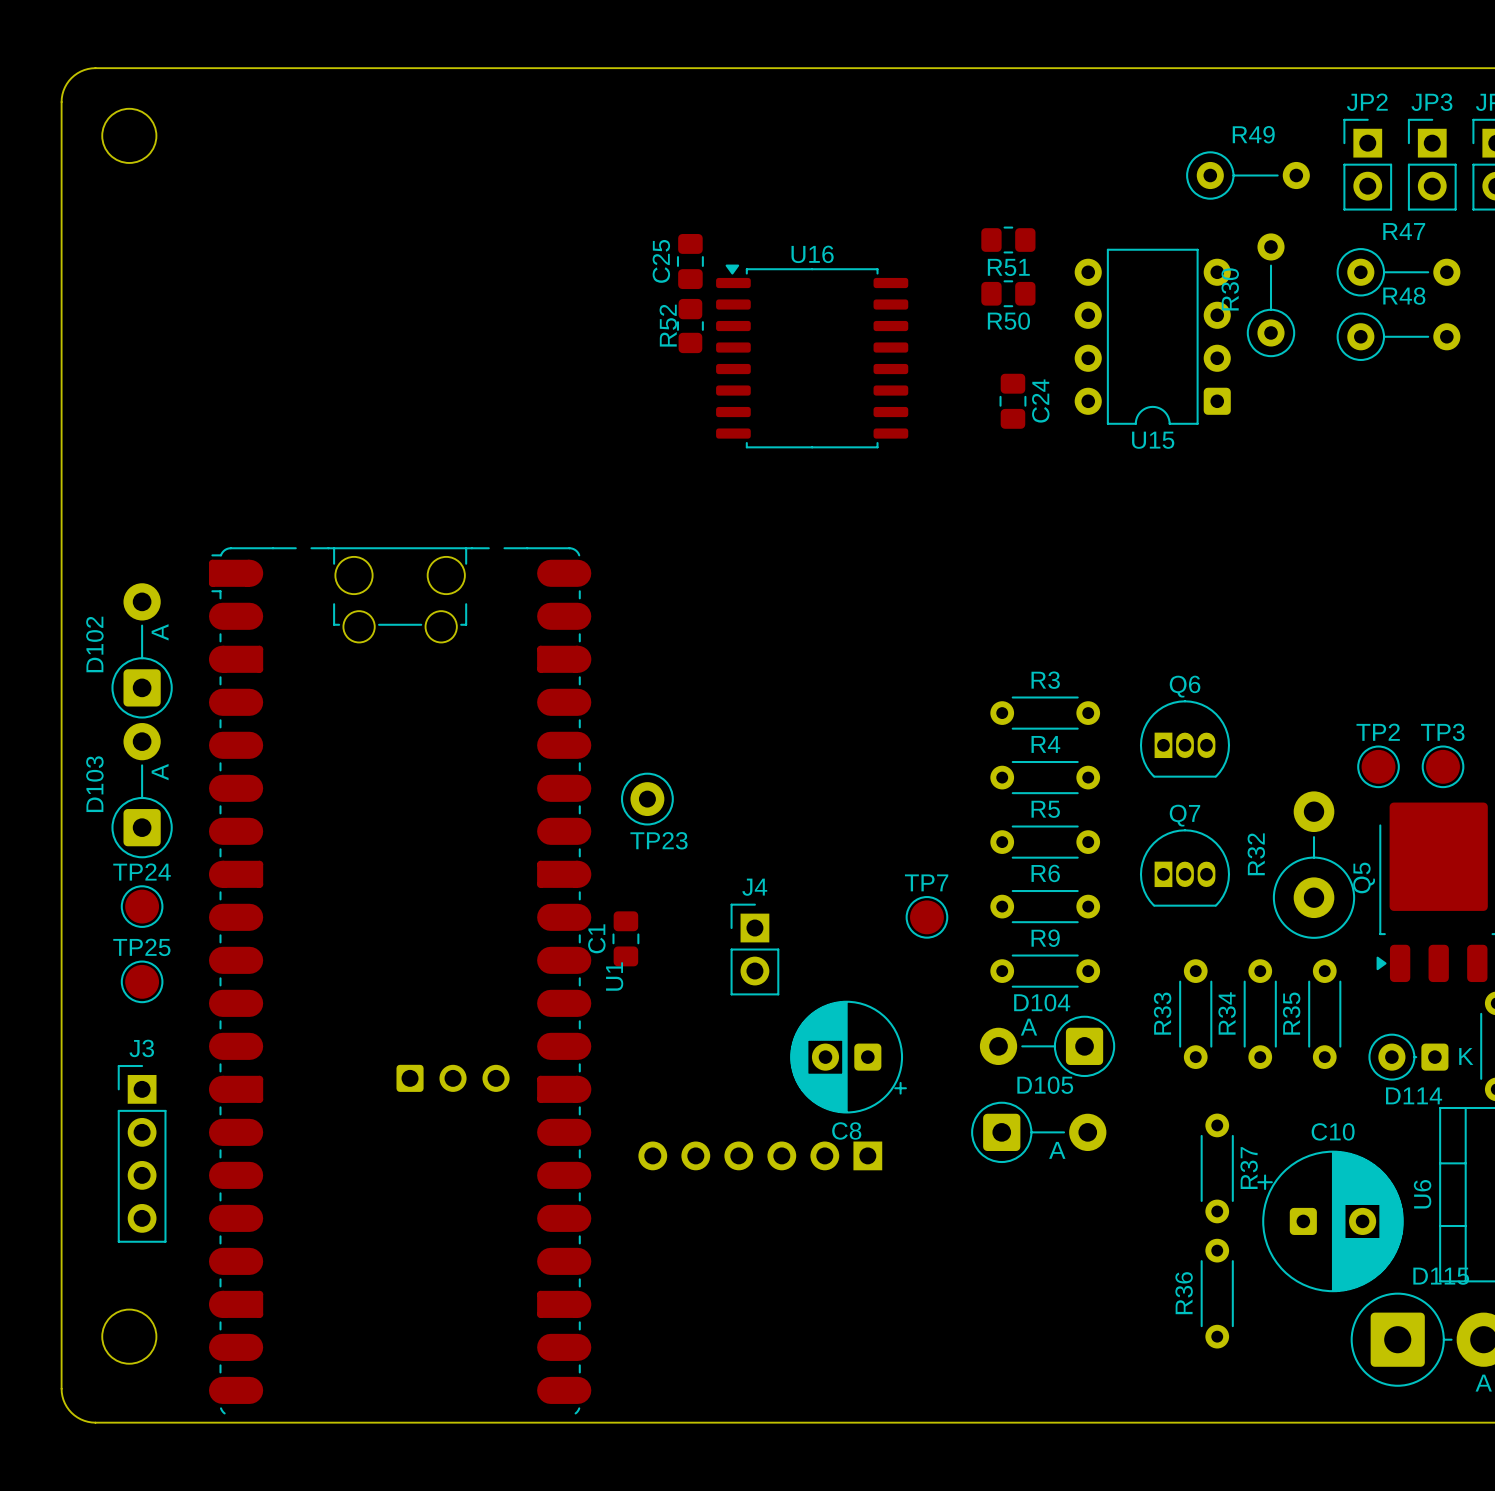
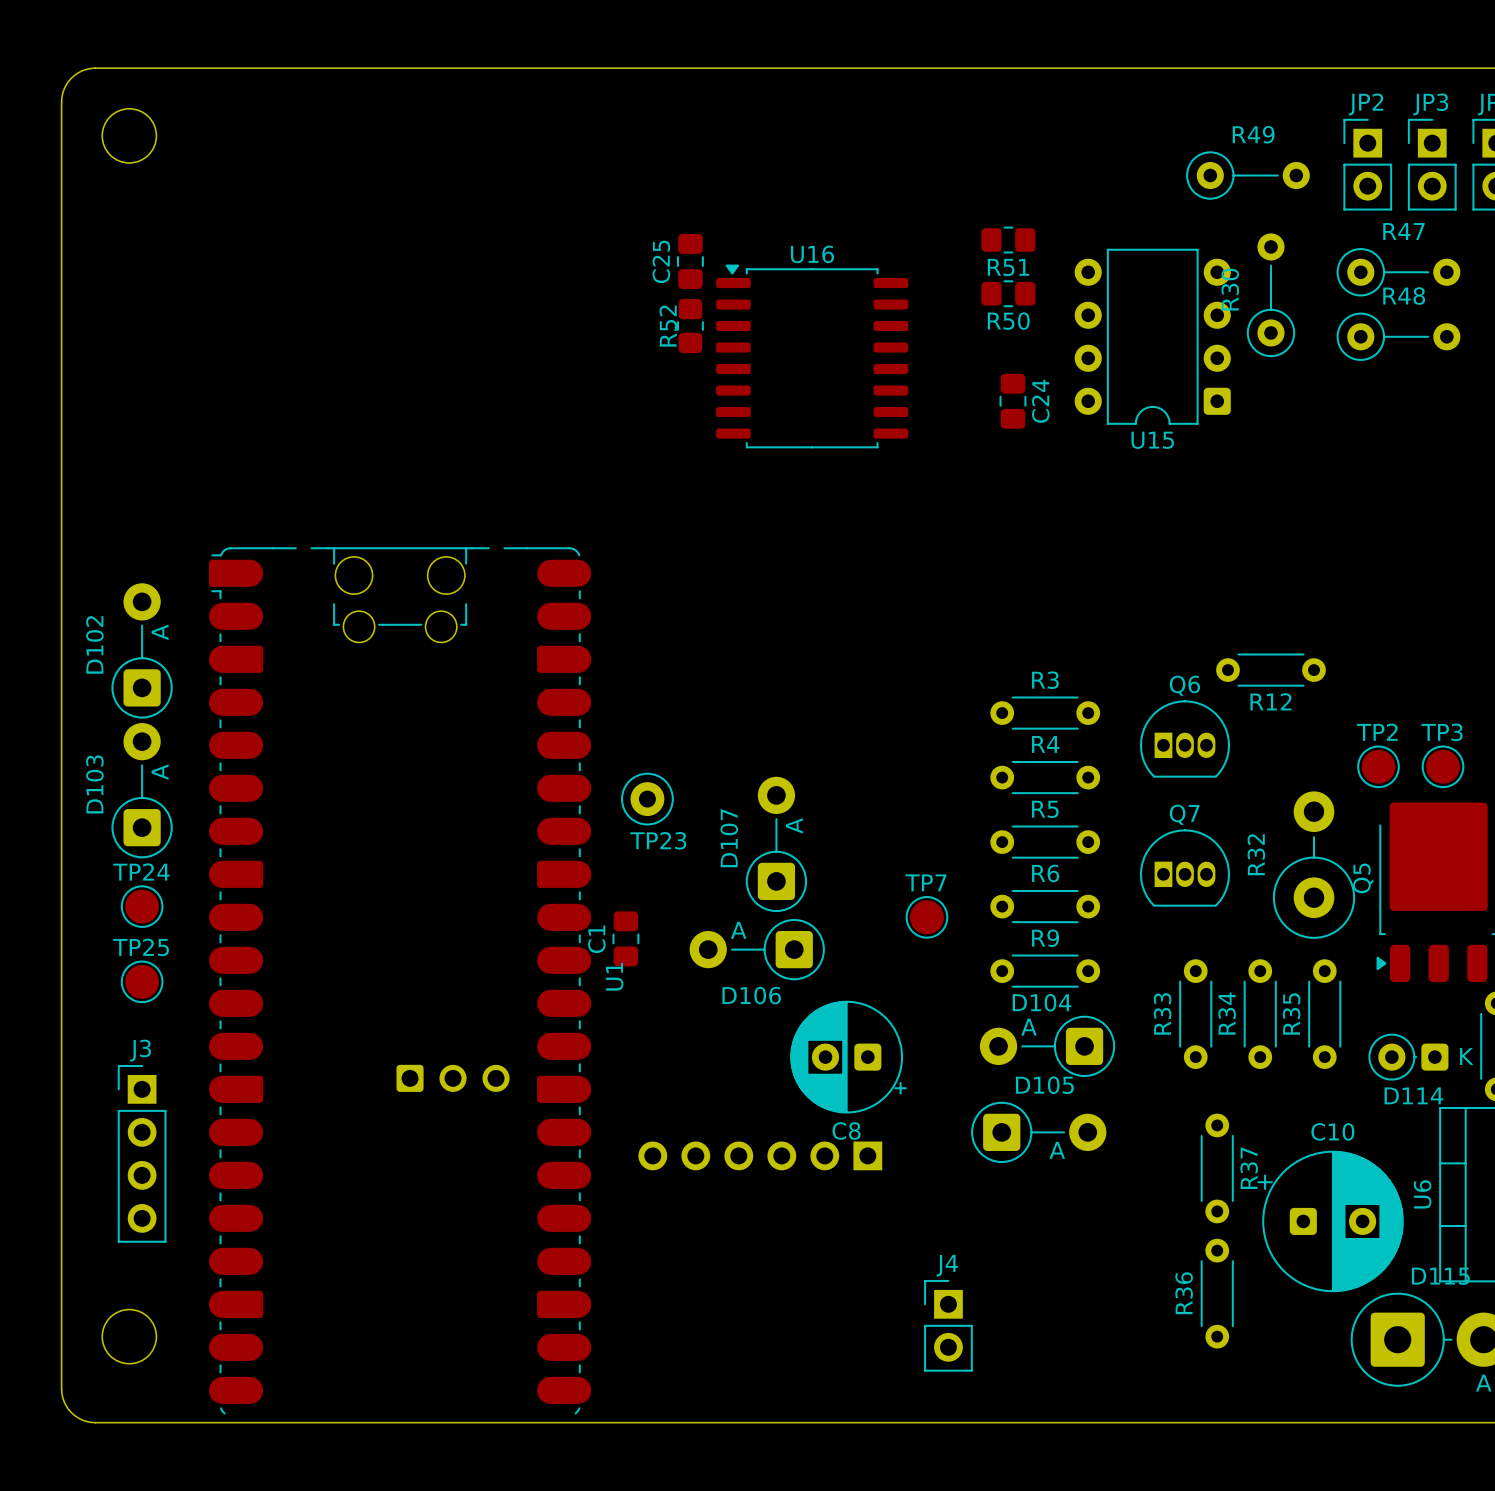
R12: none -> (1271, 670)
D107: none -> (776, 844)
J4 position: (754, 949) -> (948, 1325)
D106: none -> (757, 949)

